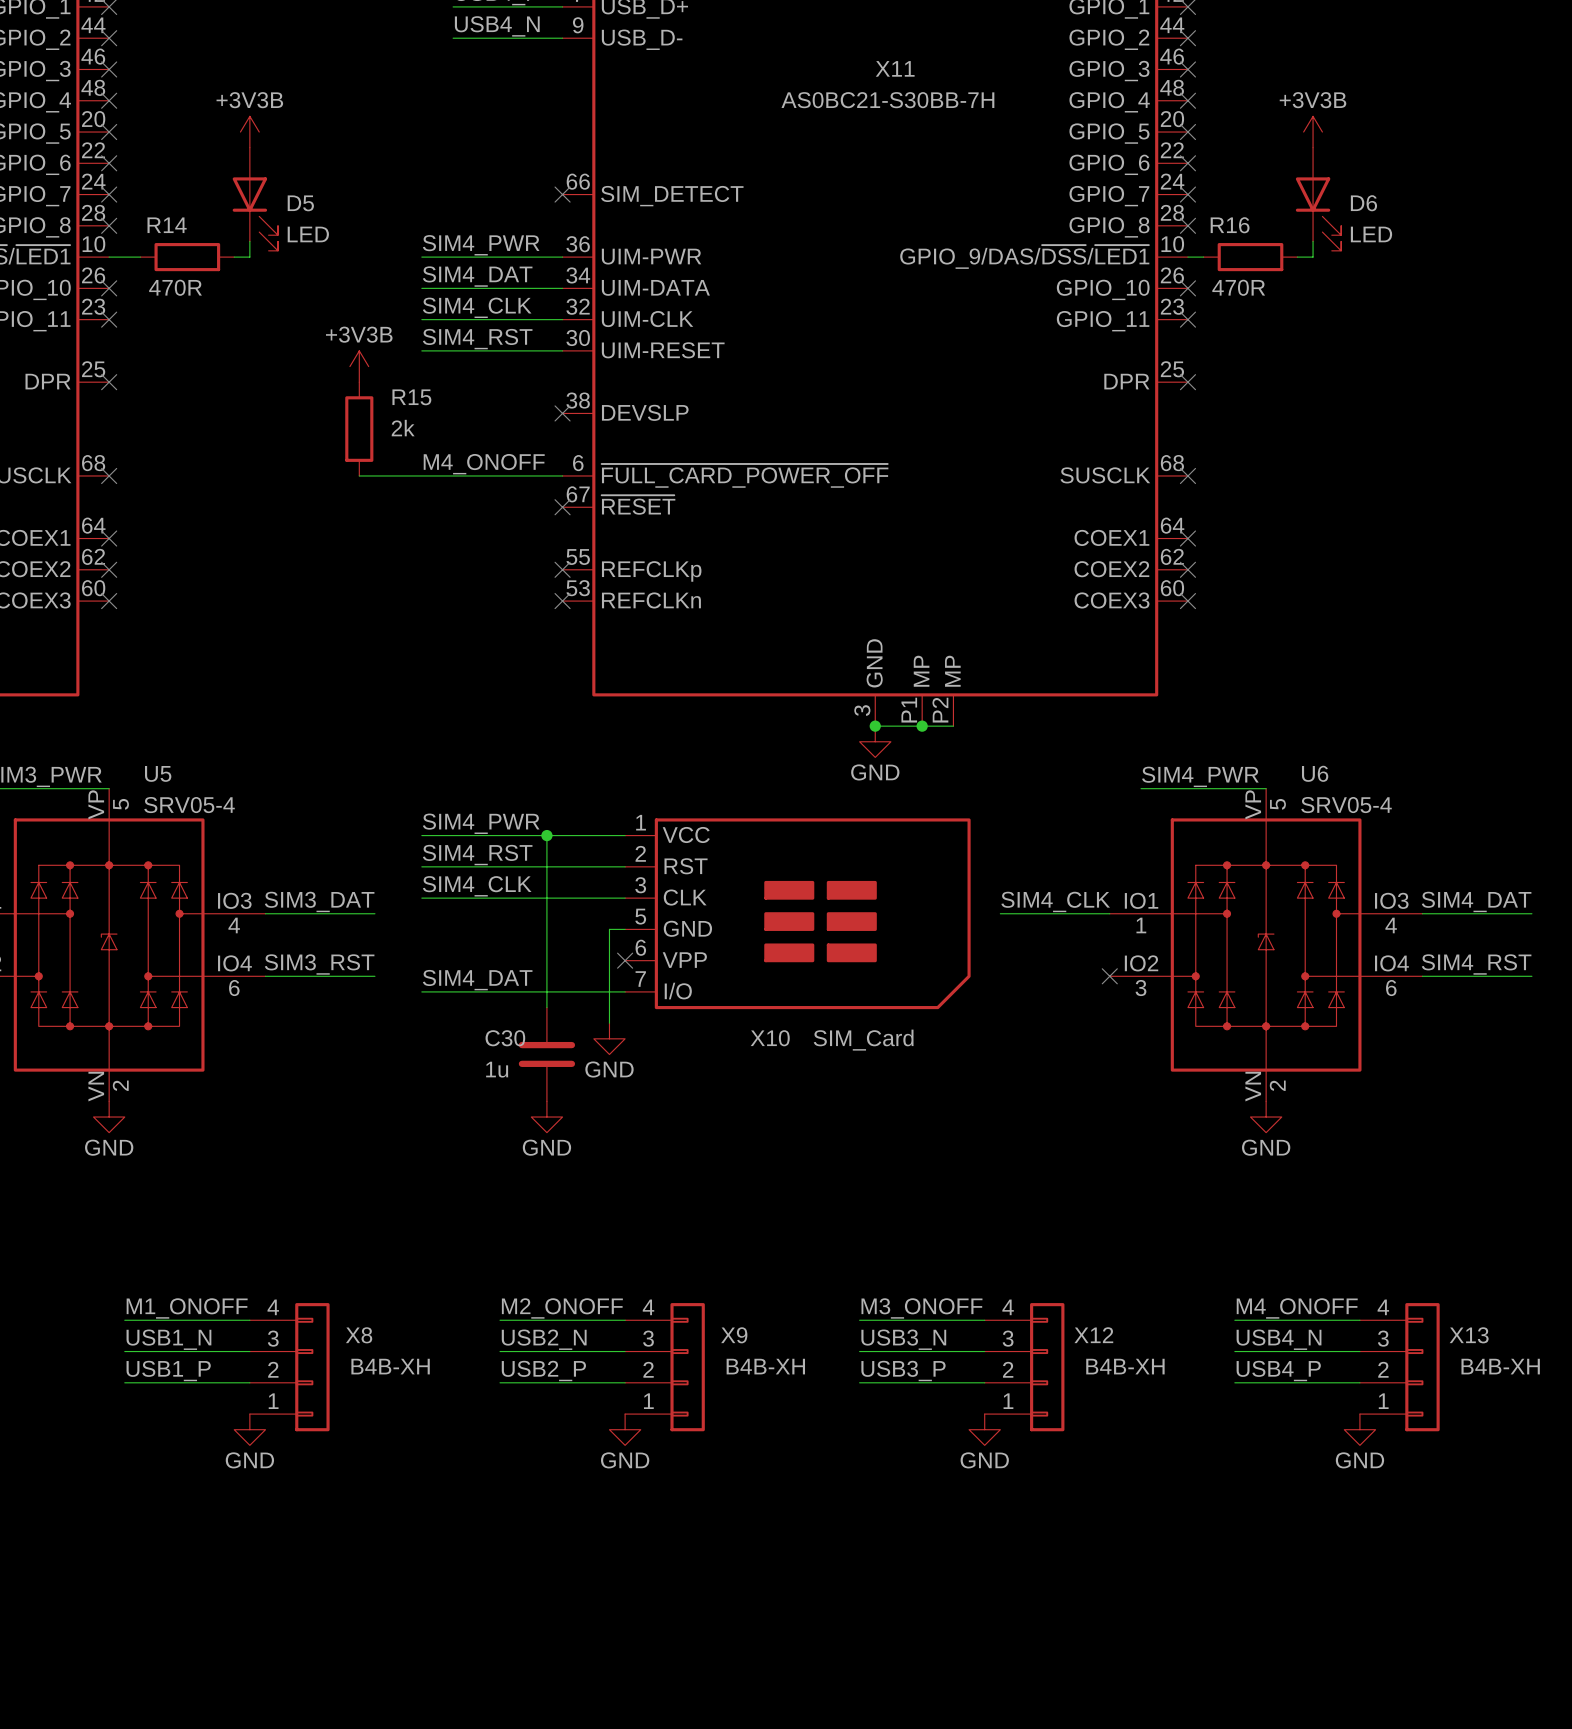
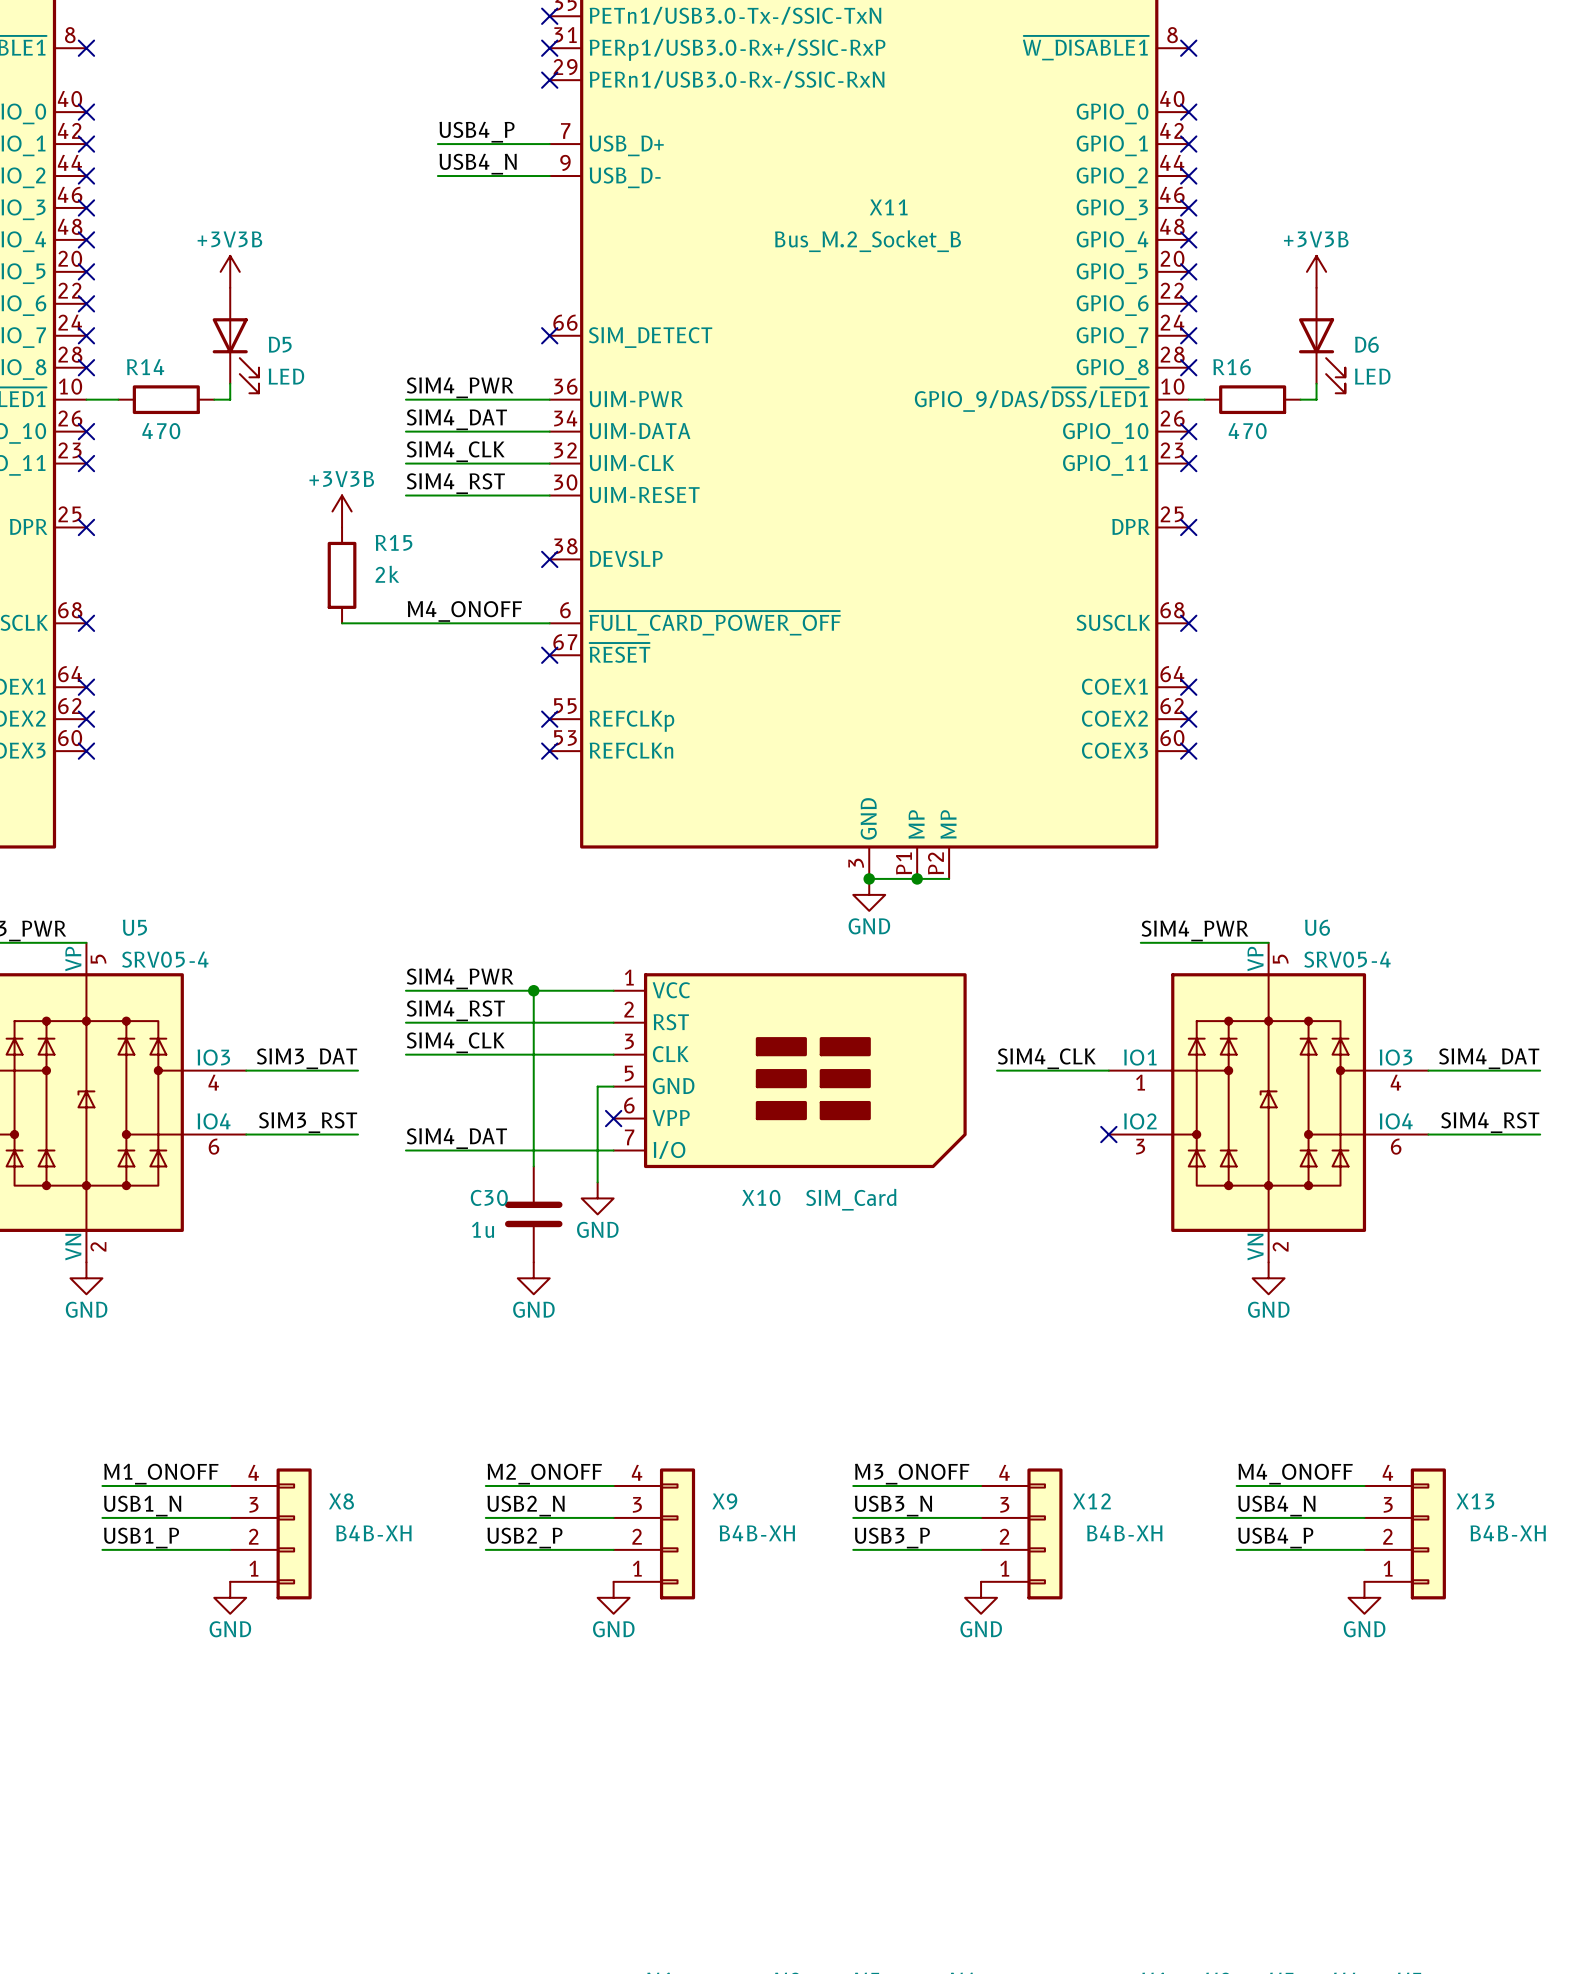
X11 value: AS0BC21-S30BB-7H (887, 100) -> Bus_M.2_Socket_B (867, 241)
R14 value: 470R (175, 287) -> 470 (161, 431)
R16 value: 470R (1238, 287) -> 470 (1247, 431)

